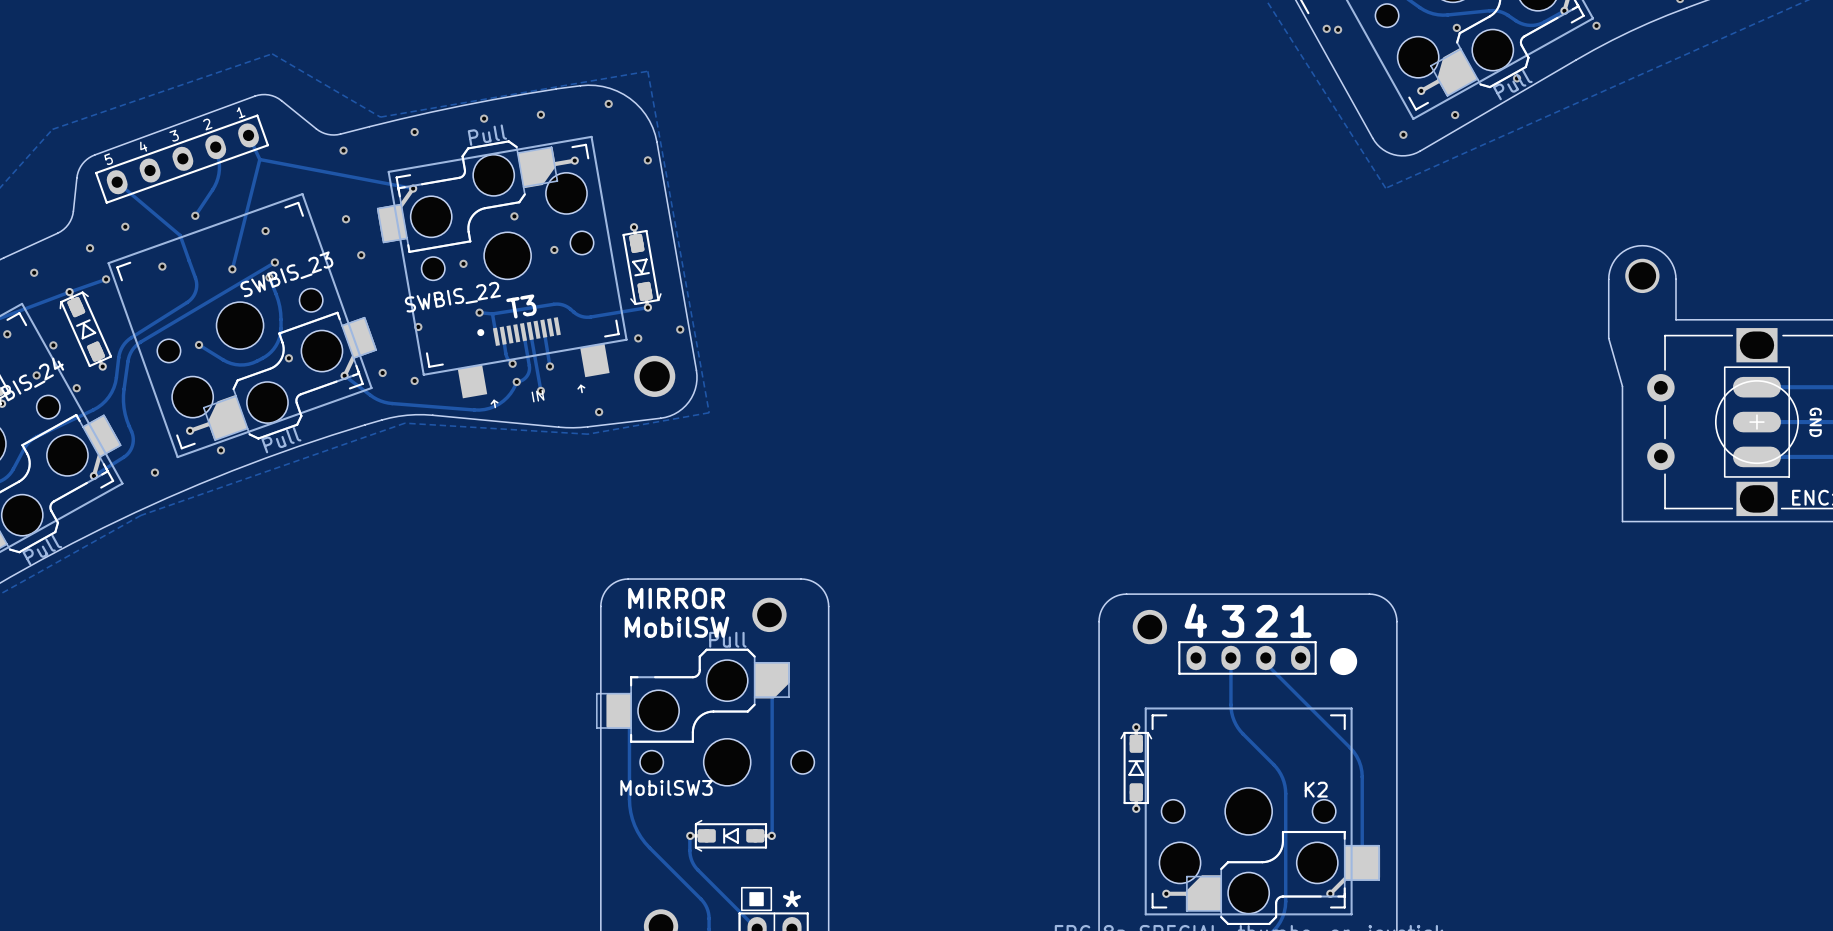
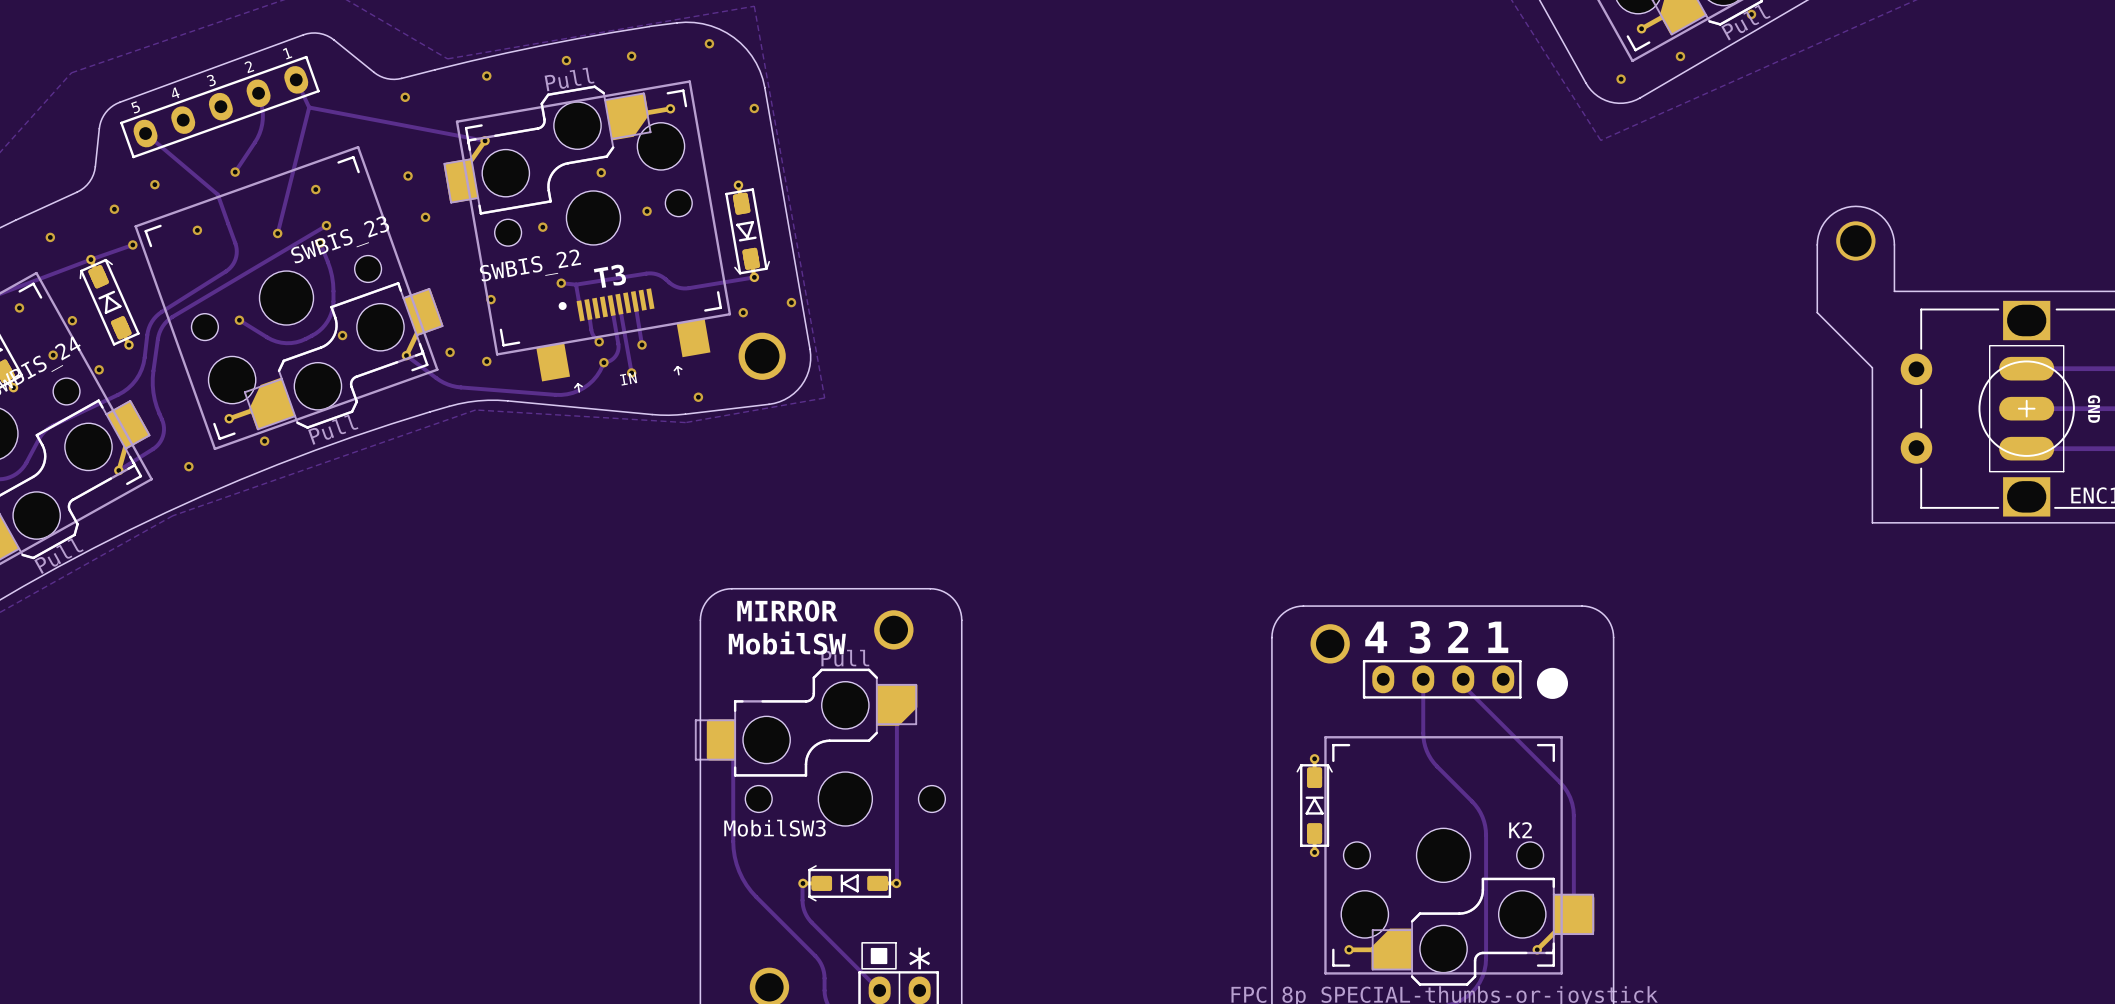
part position: (1642, 275) -> (1855, 241)
board edge: (1676, 319) (1675, 275) (1667, 257) (1658, 249) (1646, 245) (1634, 246) (1620, 254) (1612, 263) (1608, 275) (1608, 338) (1622, 386) -> (1933, 291) (1894, 291) (1893, 235) (1887, 223) (1877, 213) (1865, 207) (1851, 206) (1837, 210) (1826, 219) (1819, 231) (1817, 240) (1817, 312) (1872, 367)

